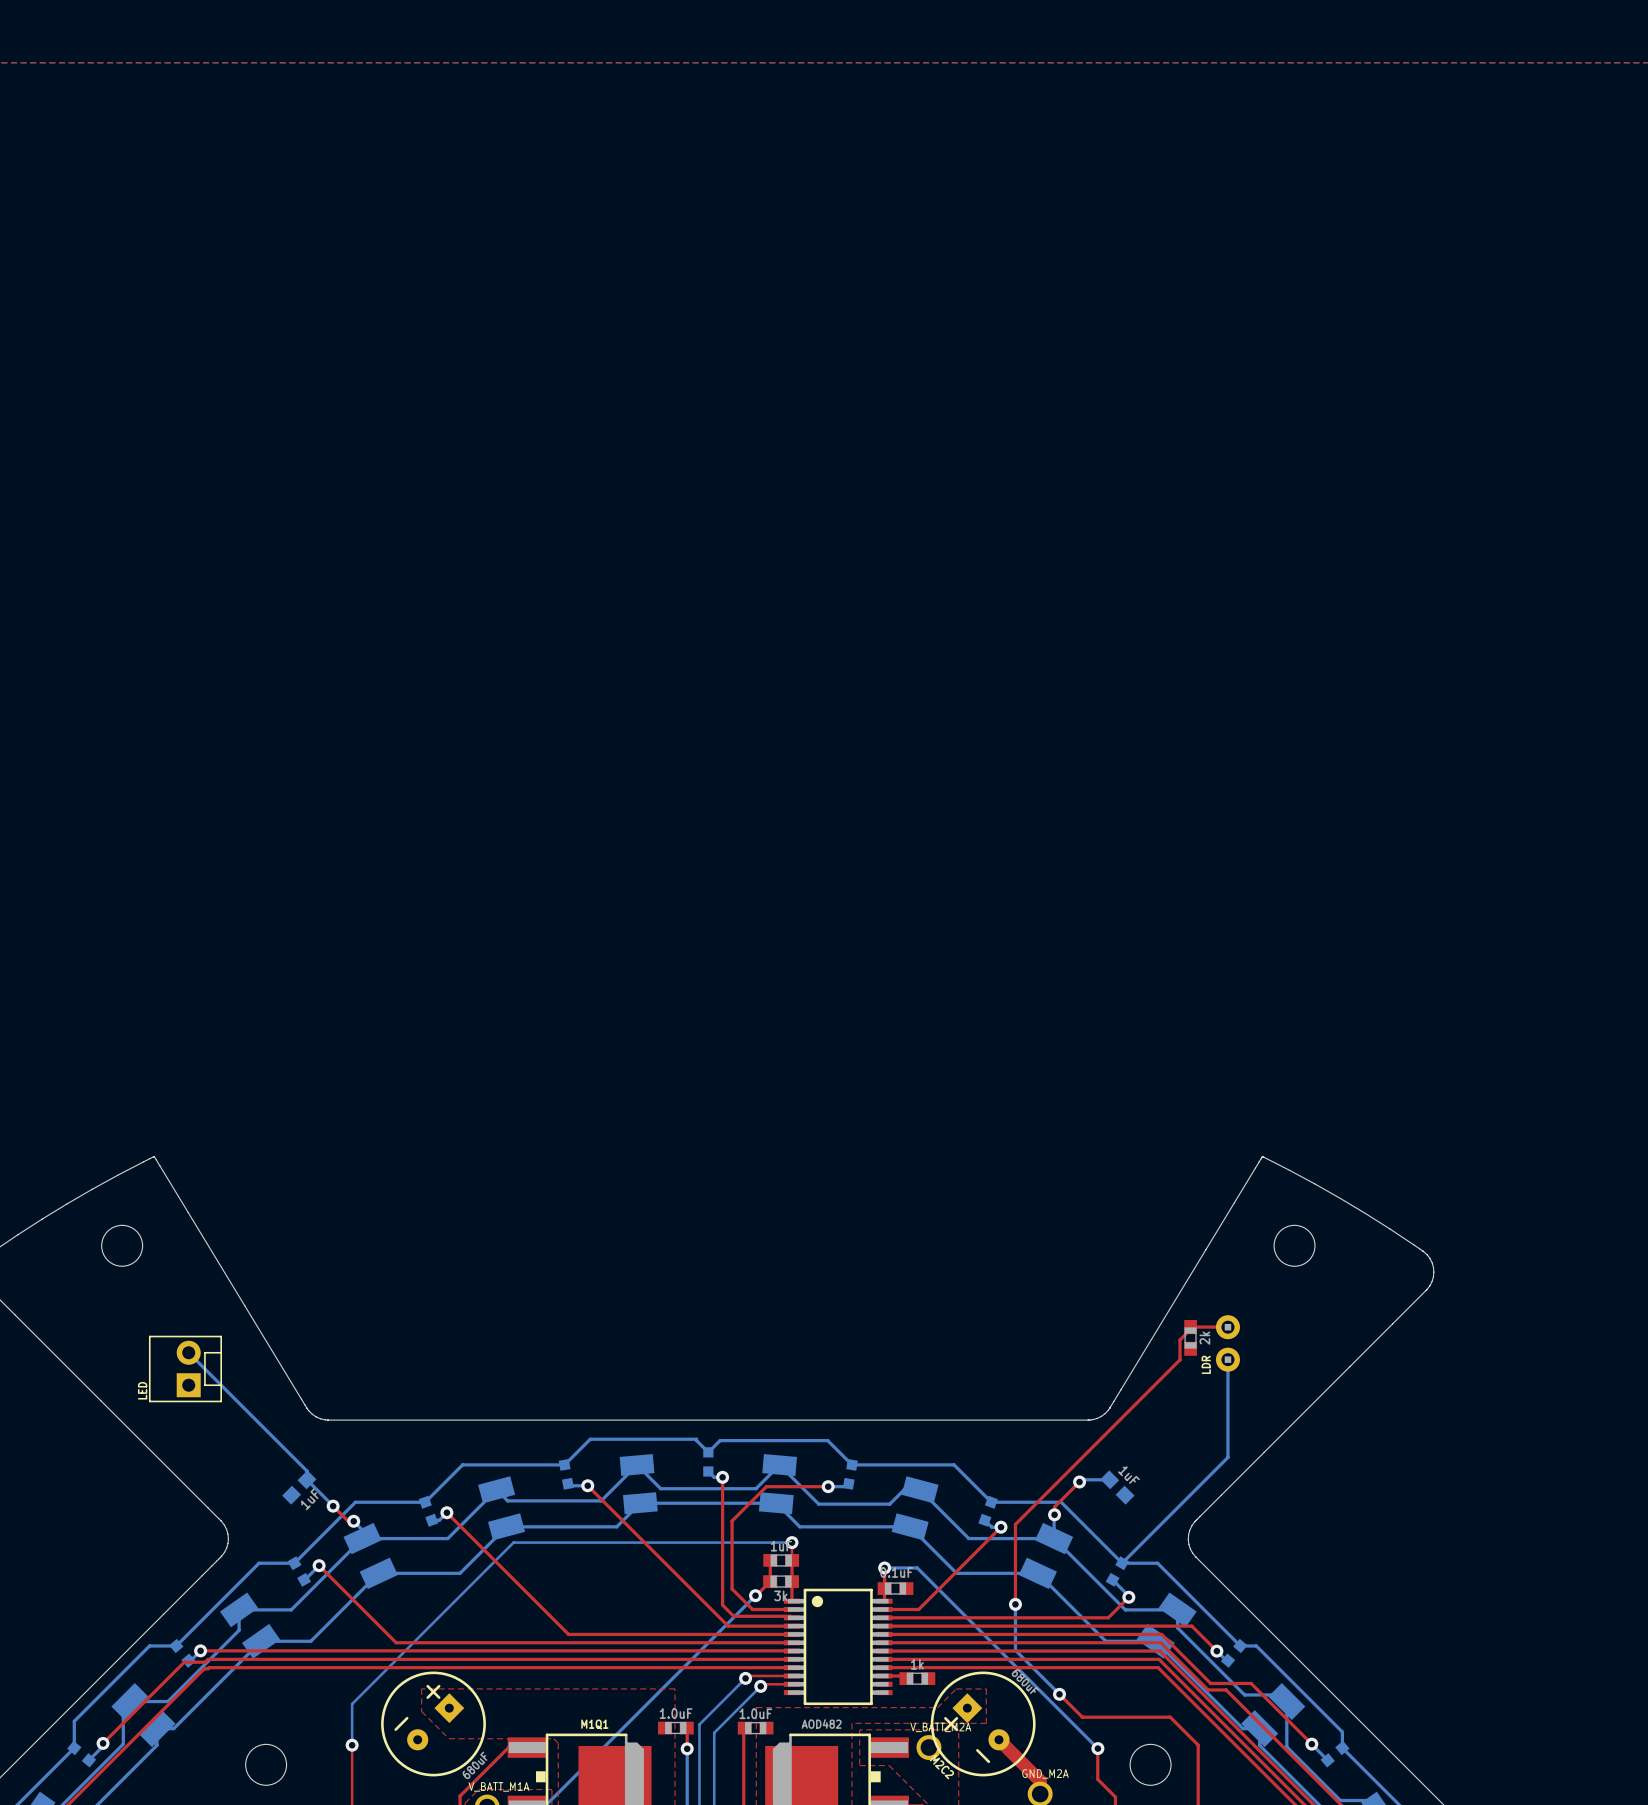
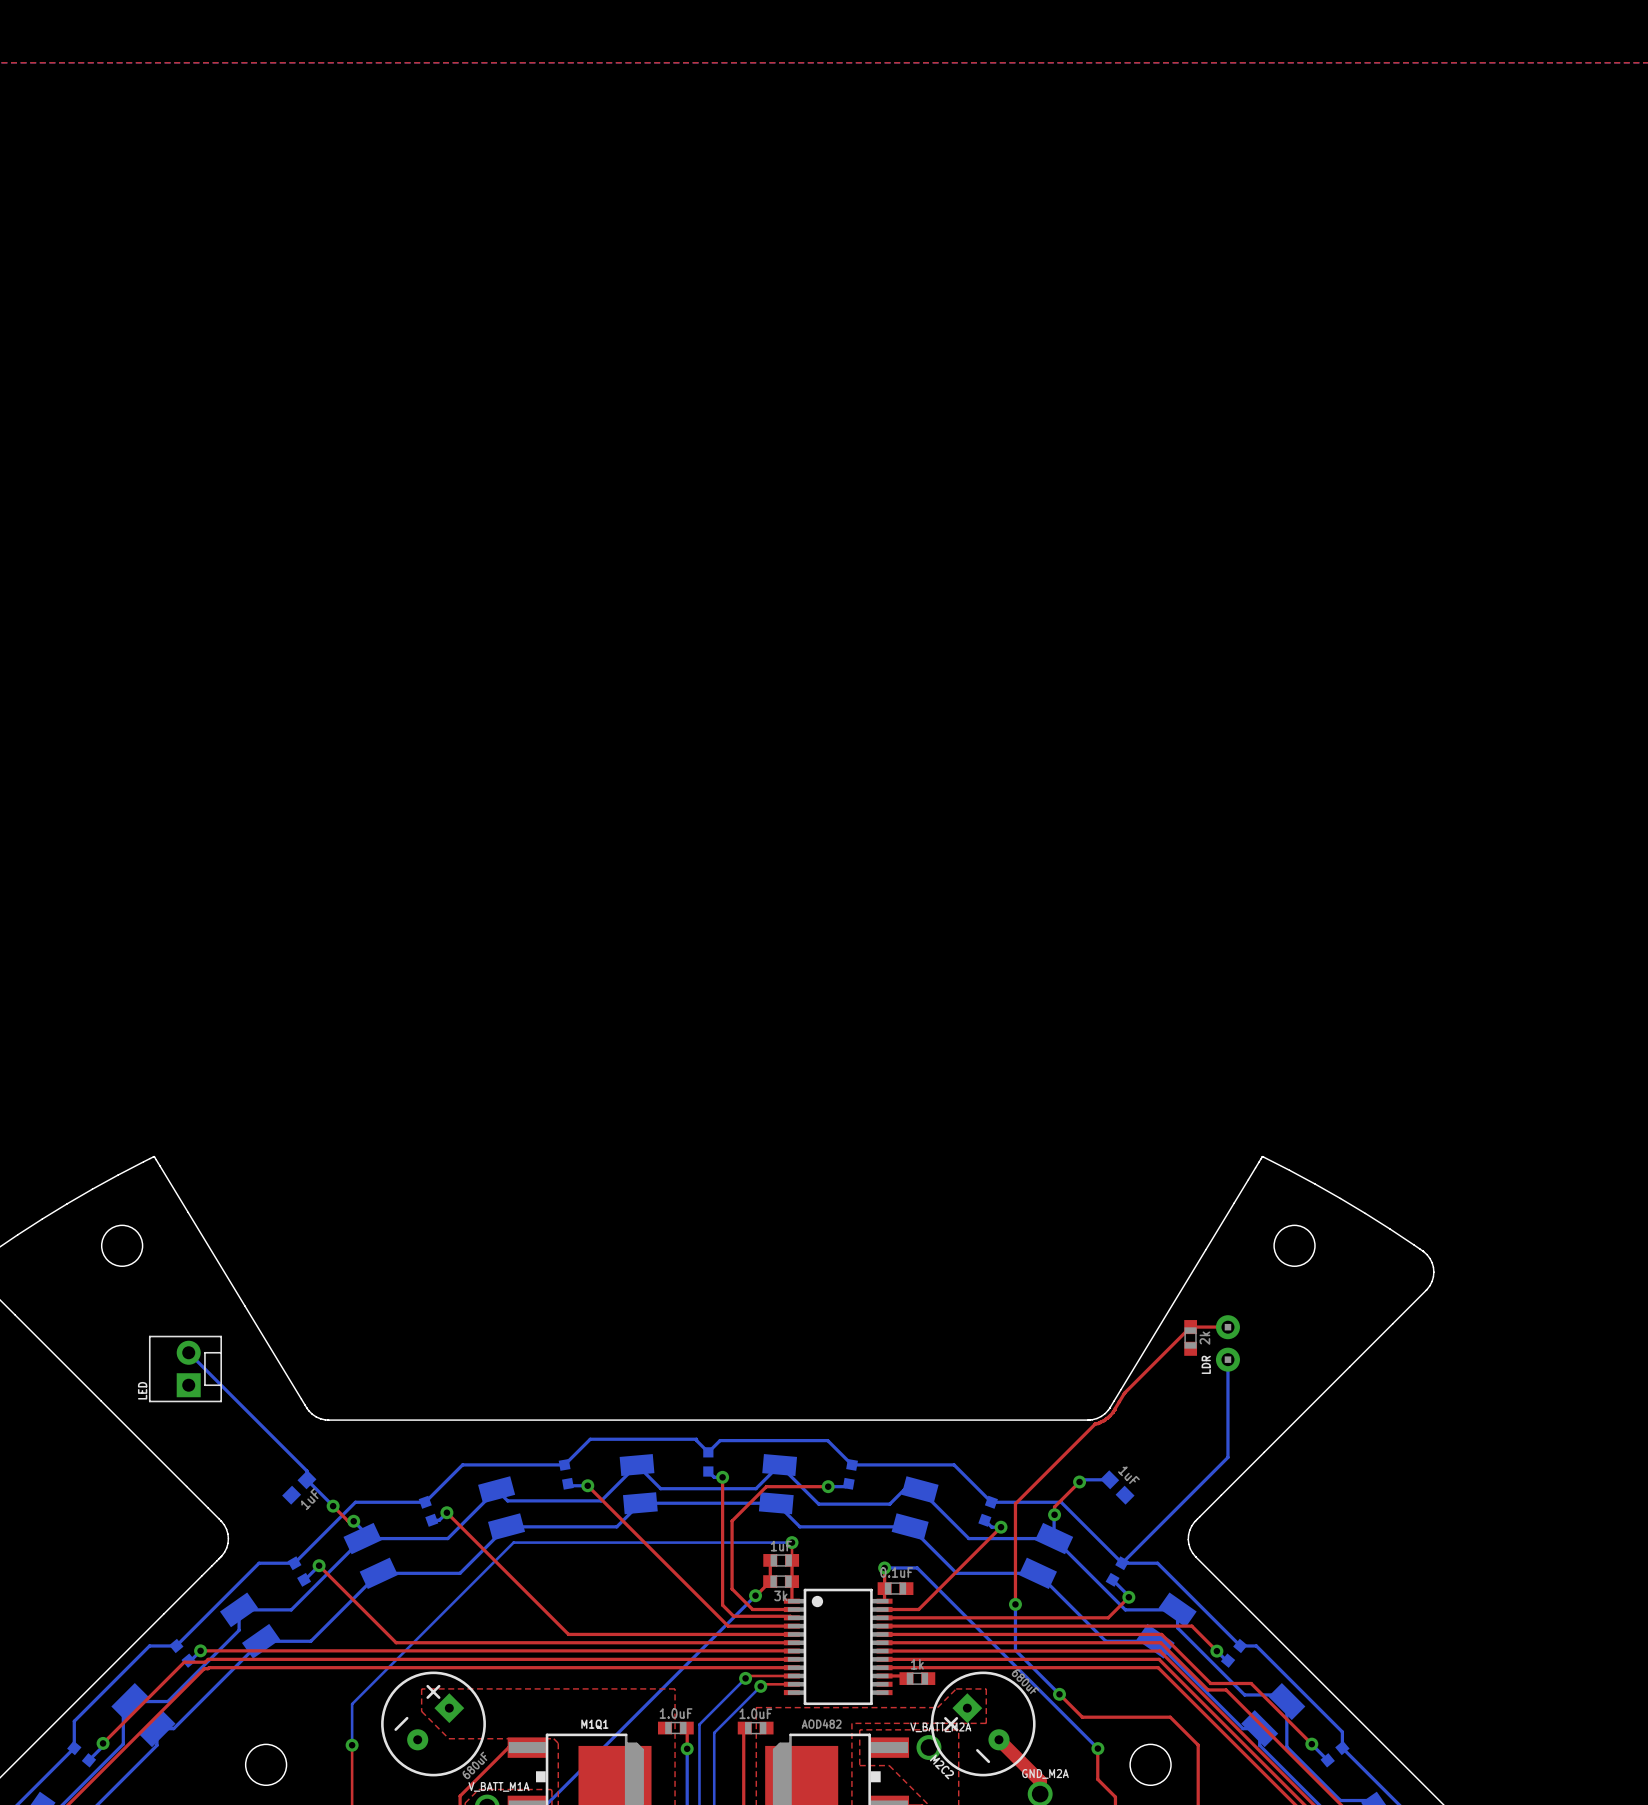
top track: (1190, 1327) (1180, 1340) (1180, 1359) (1015, 1524) -> (1109, 1416) (1095, 1424) (1015, 1503) (1015, 1524)
top track: none -> (1190, 1327) (1124, 1393) (1109, 1416)

